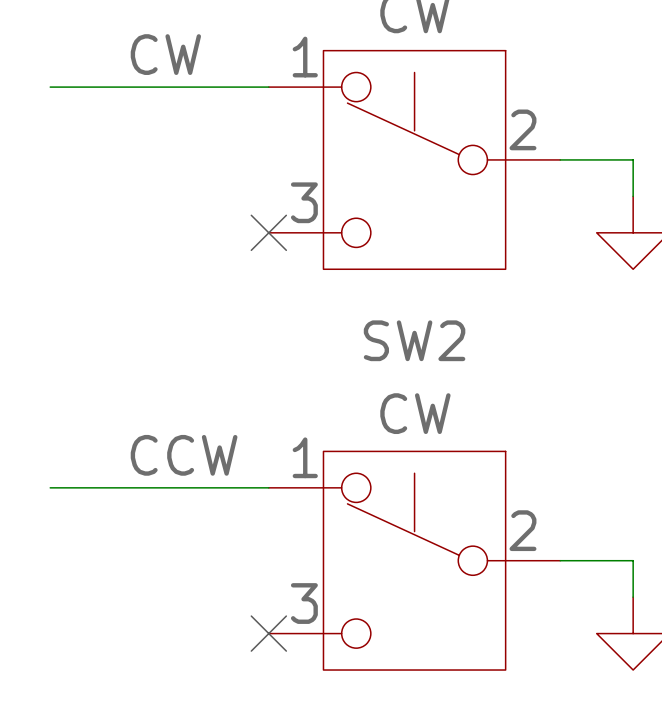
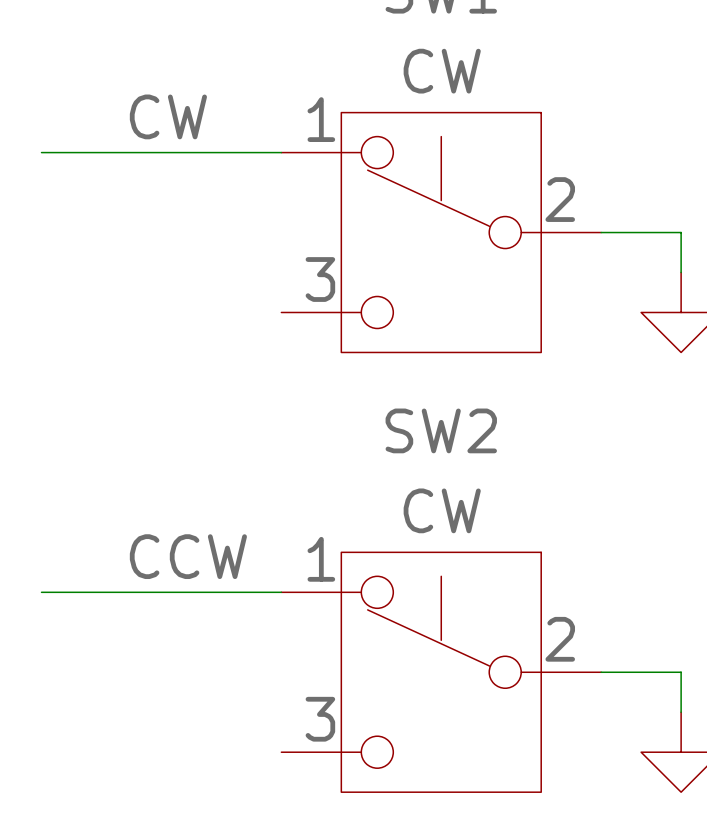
no-connect mark: (268, 232) -> none
no-connect mark: (268, 633) -> none

